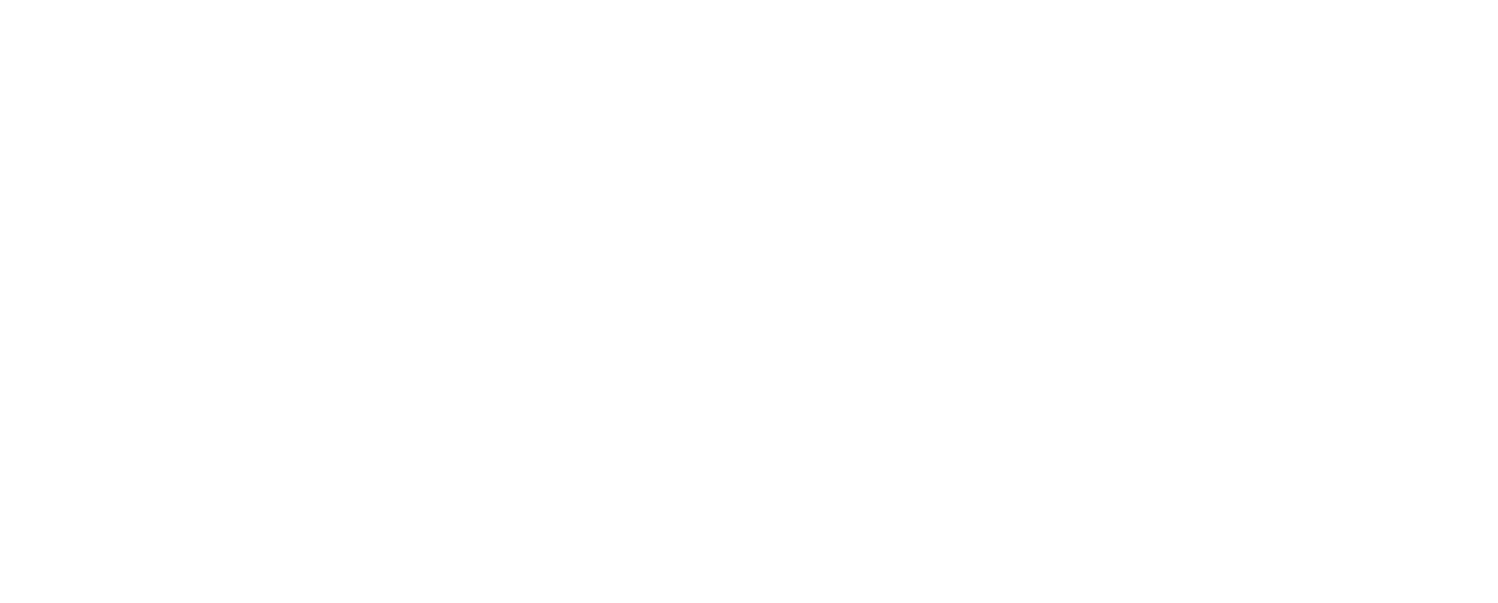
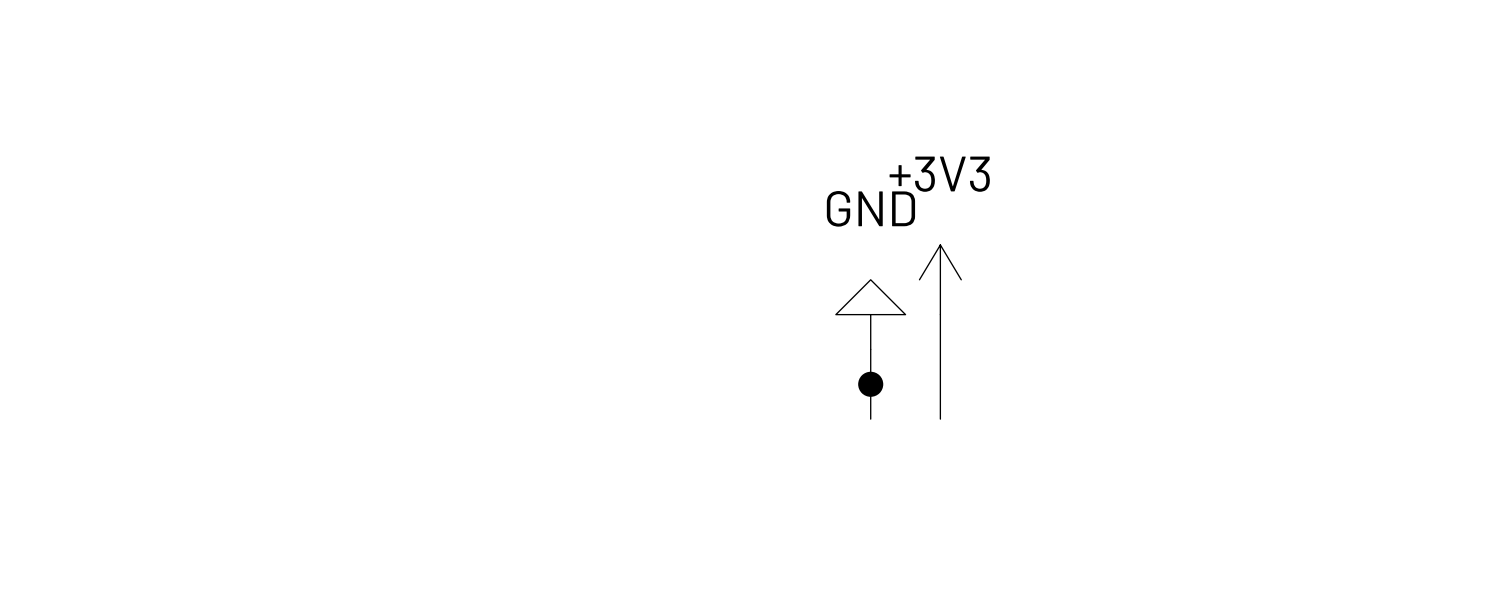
power symbol: none -> +3V3 (940, 279)
power symbol: none -> GND (870, 314)
wire: none -> (940, 314) (940, 419)
wire: none -> (870, 349) (870, 419)
junction: none -> (870, 384)

